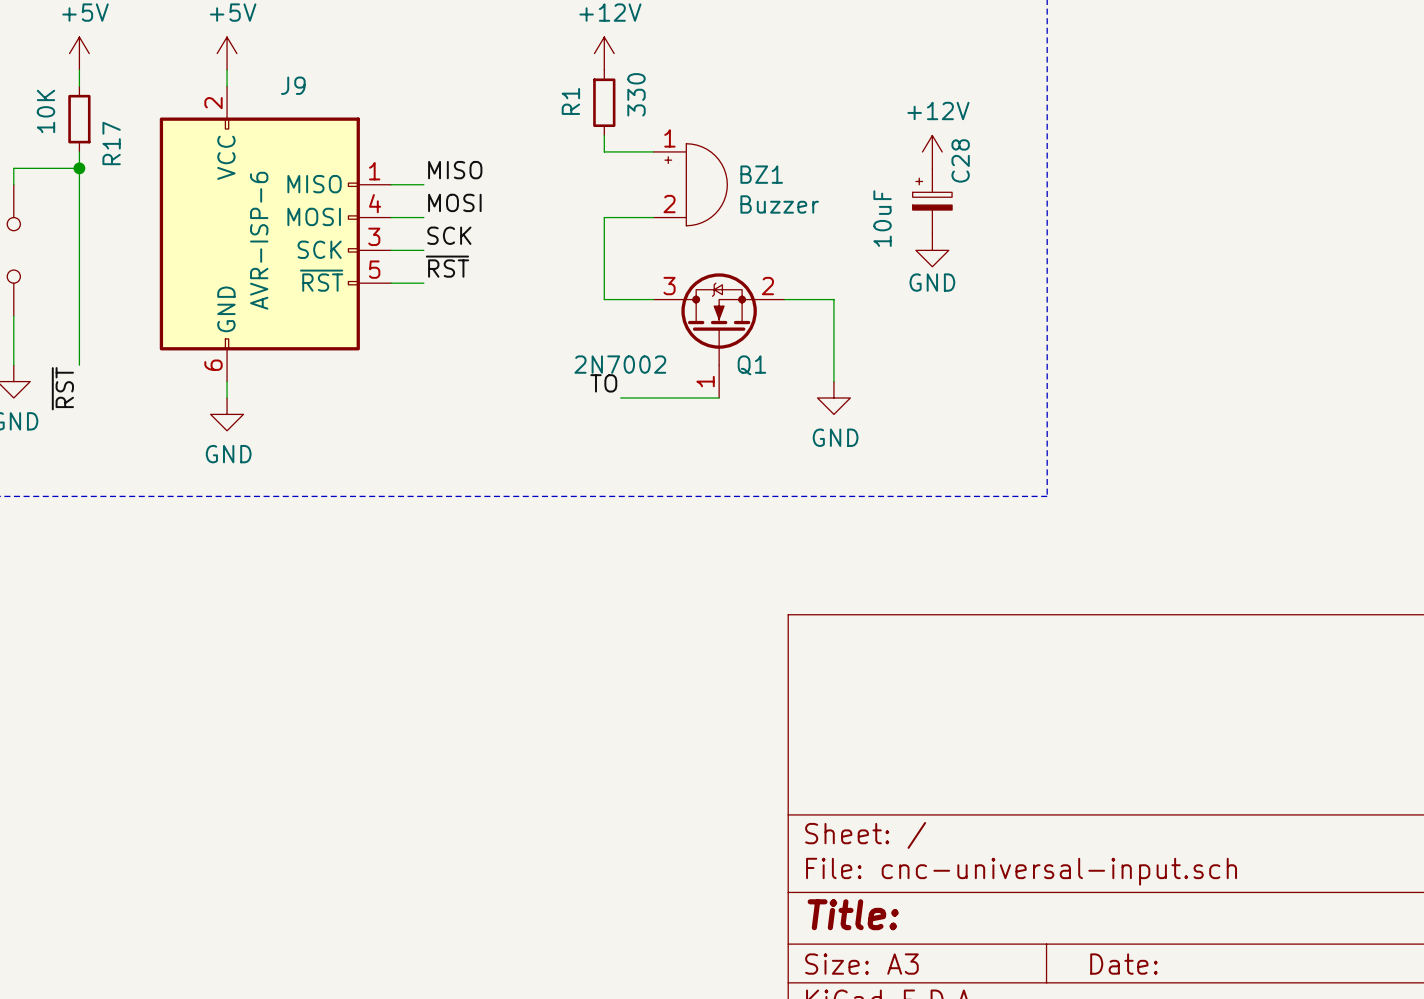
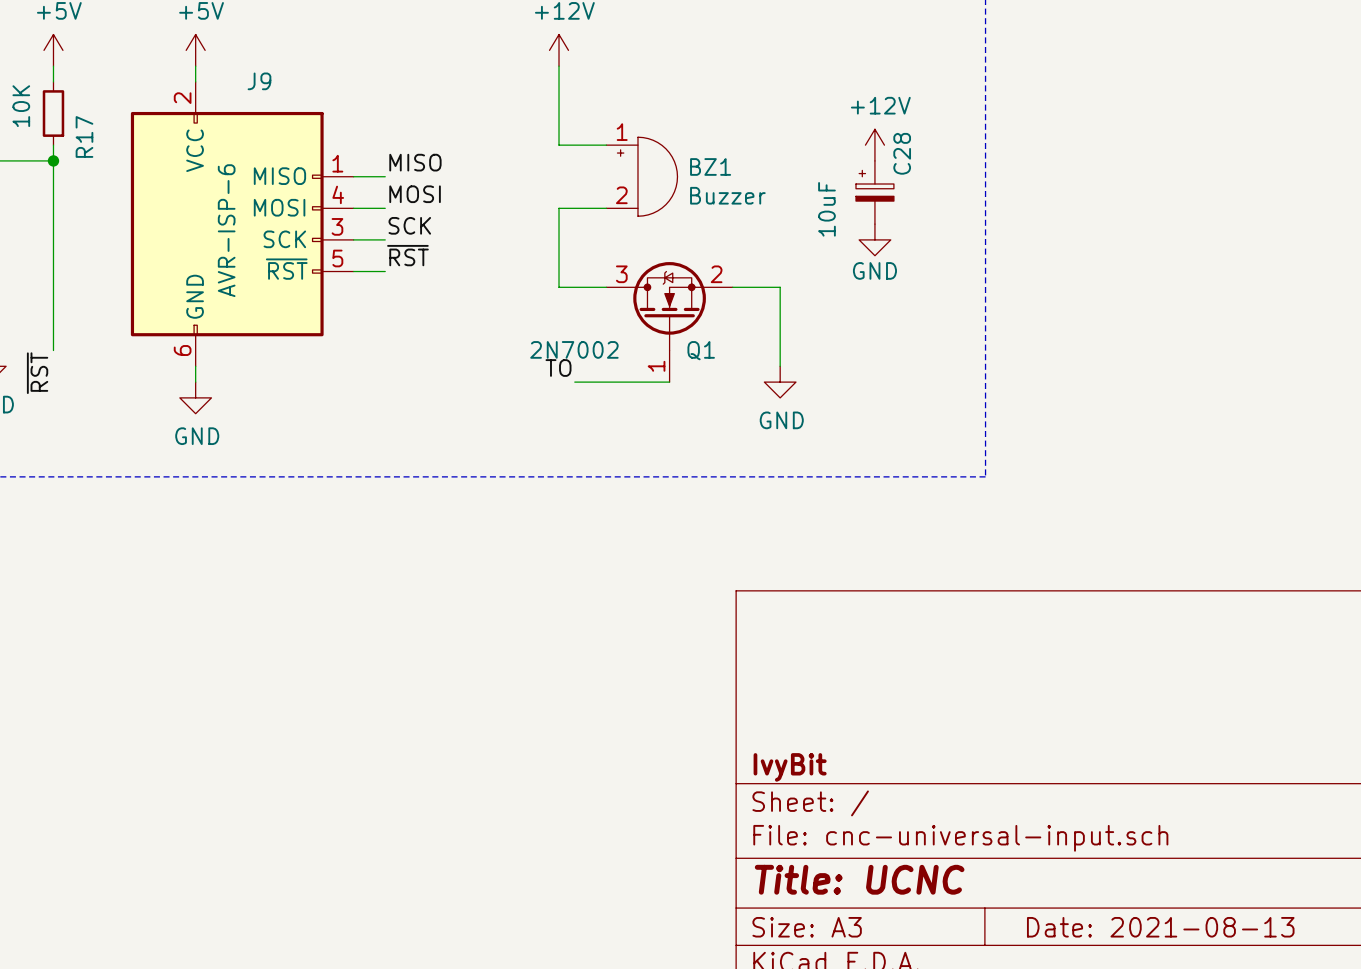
wire: none -> (559, 66) (559, 129)
R1: 330 (604, 102) -> none
title block: none -> IvyBit (790, 767)
title block: Title: (853, 914) -> Title: UCNC (859, 879)
title block: Date: (1123, 964) -> Date: 2021-08-13 (1160, 927)

